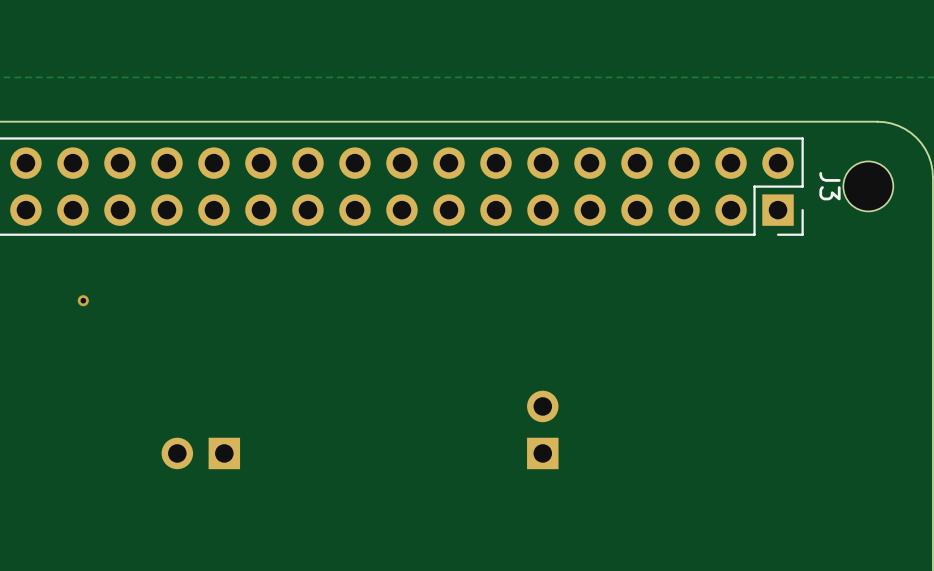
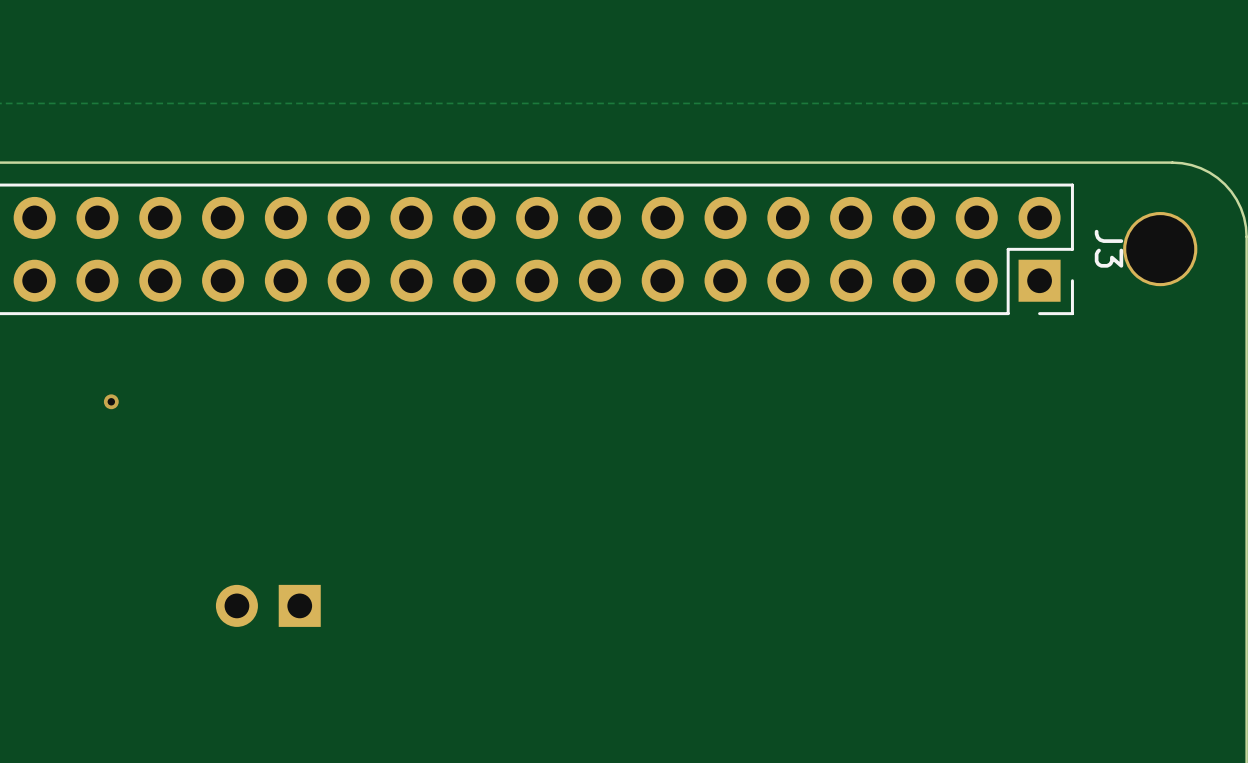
part footprint: [843, 161, 894, 212] -> [1123, 212, 1198, 287]
part: (542, 429) -> none

